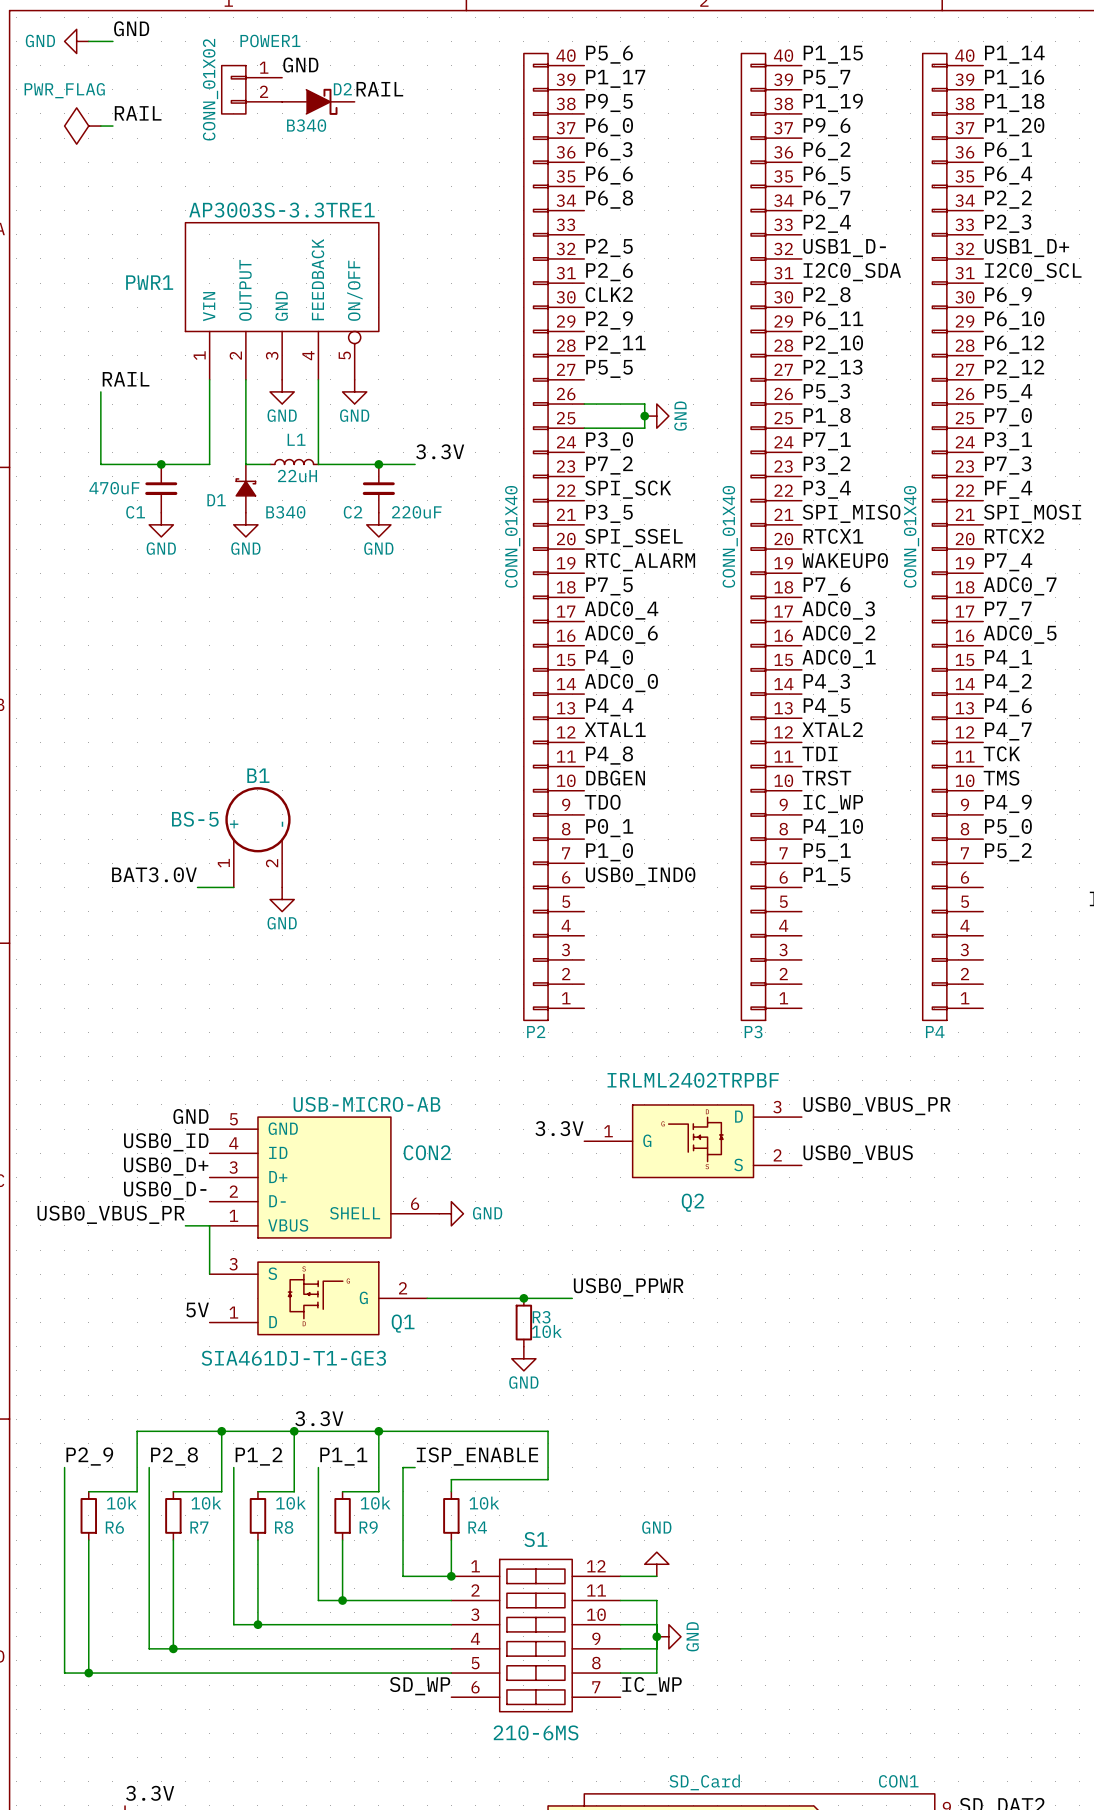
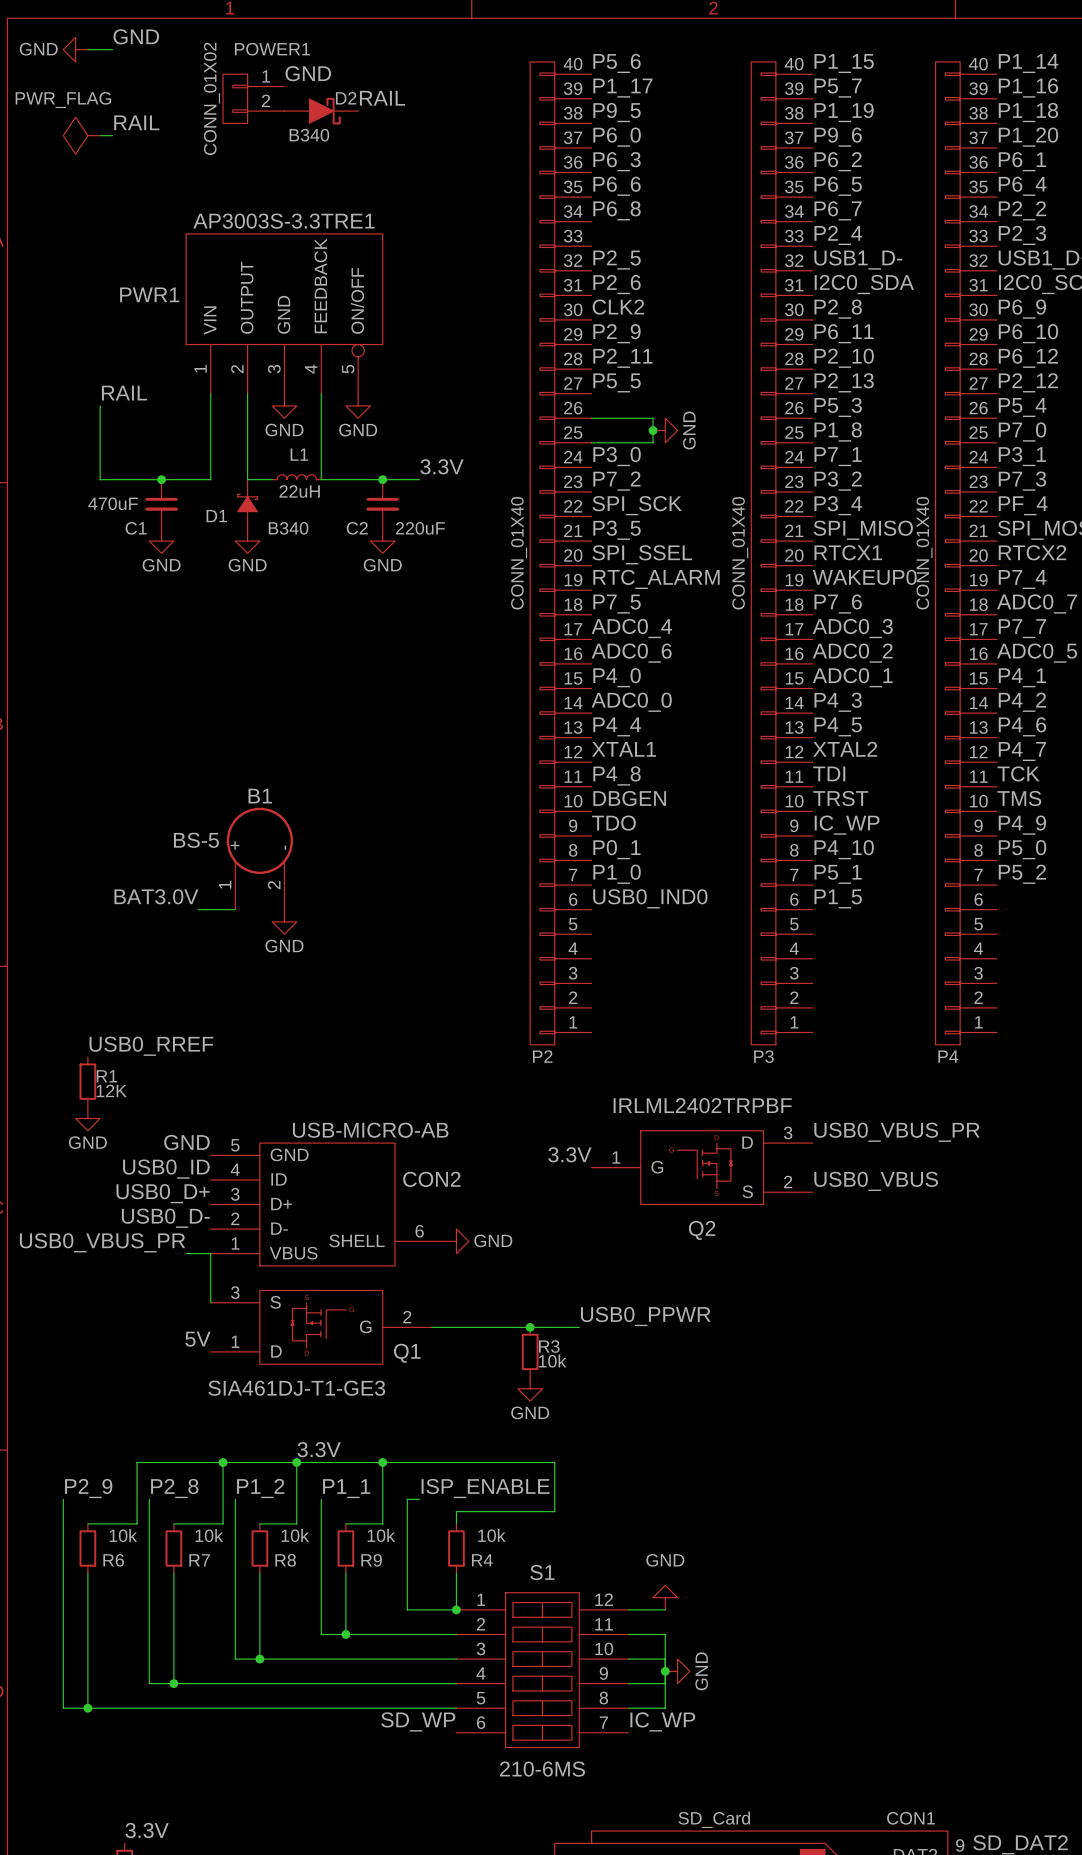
label: none -> USB0_RREF (151, 1046)
R1: none -> 12K (87, 1081)
power symbol: none -> GND (87, 1118)

